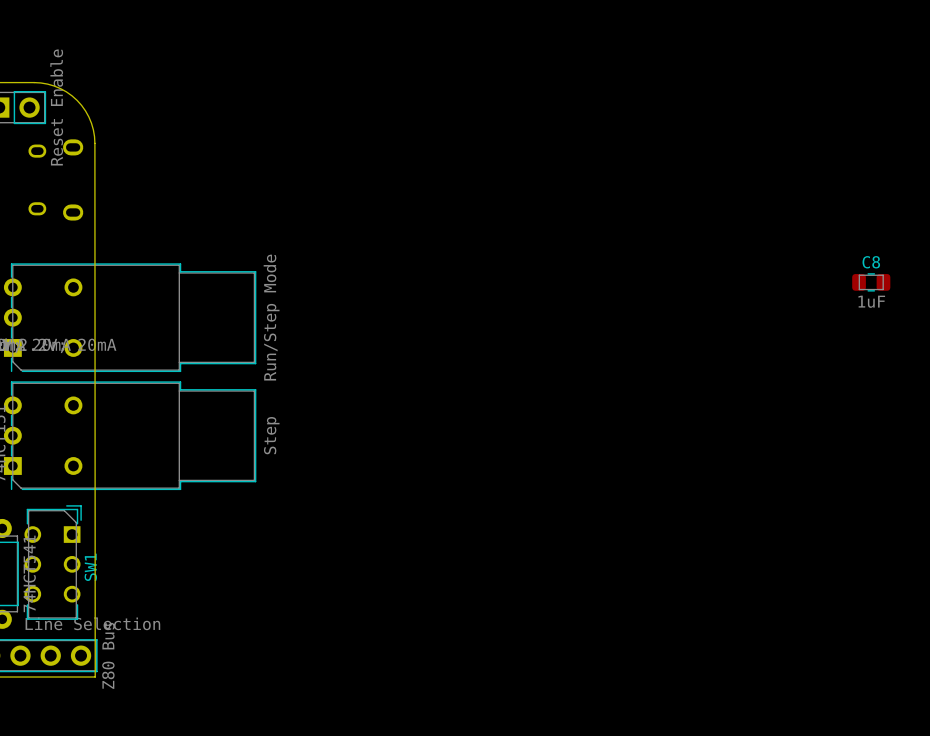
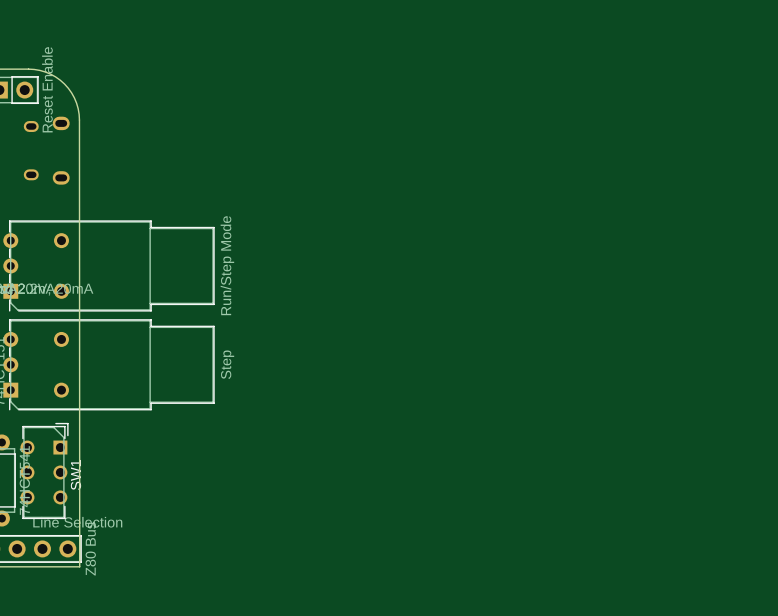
C8: 1uF (871, 282) -> none

